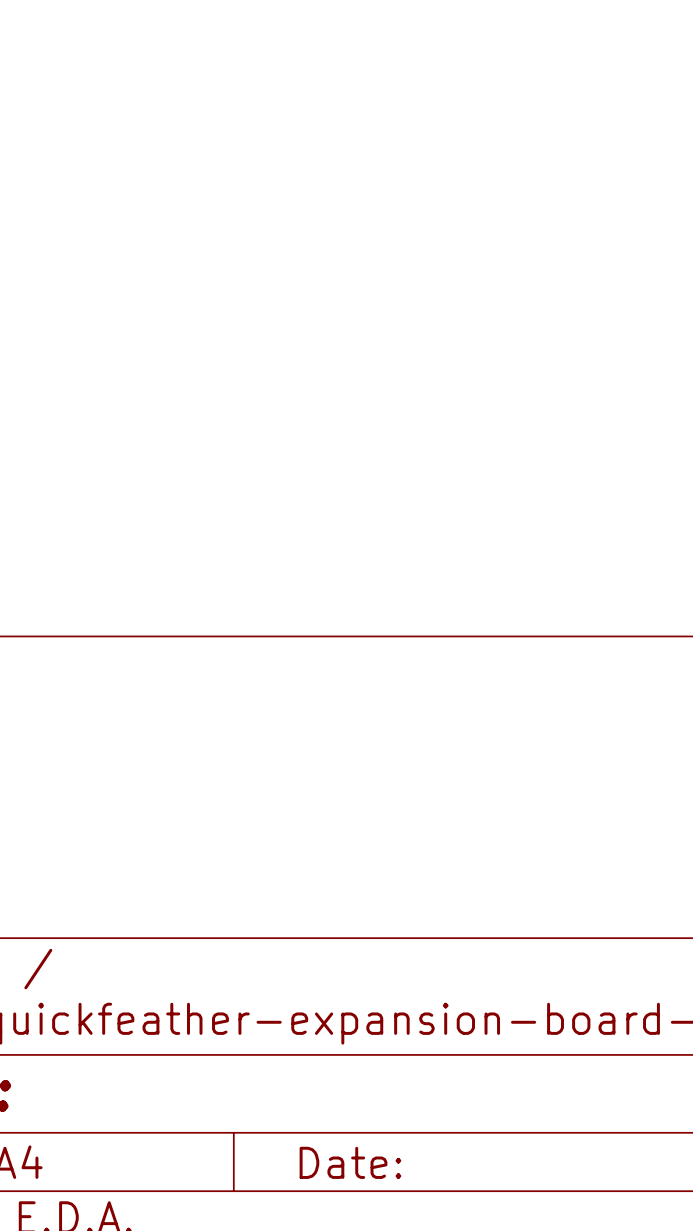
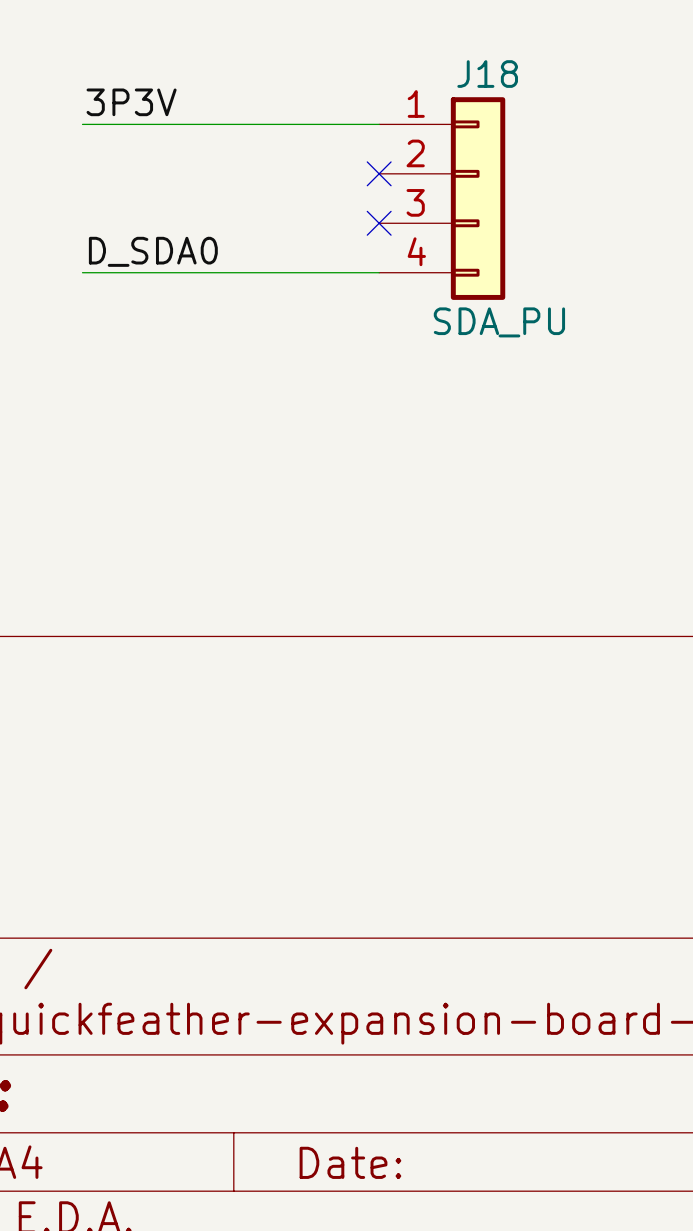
label: none -> 3P3V (131, 102)
wire: none -> (82, 124) (379, 124)
no-connect mark: none -> (379, 173)
J18: none -> SDA_PU (442, 198)
no-connect mark: none -> (379, 223)
label: none -> D_SDA0 (153, 251)
wire: none -> (82, 272) (379, 272)

